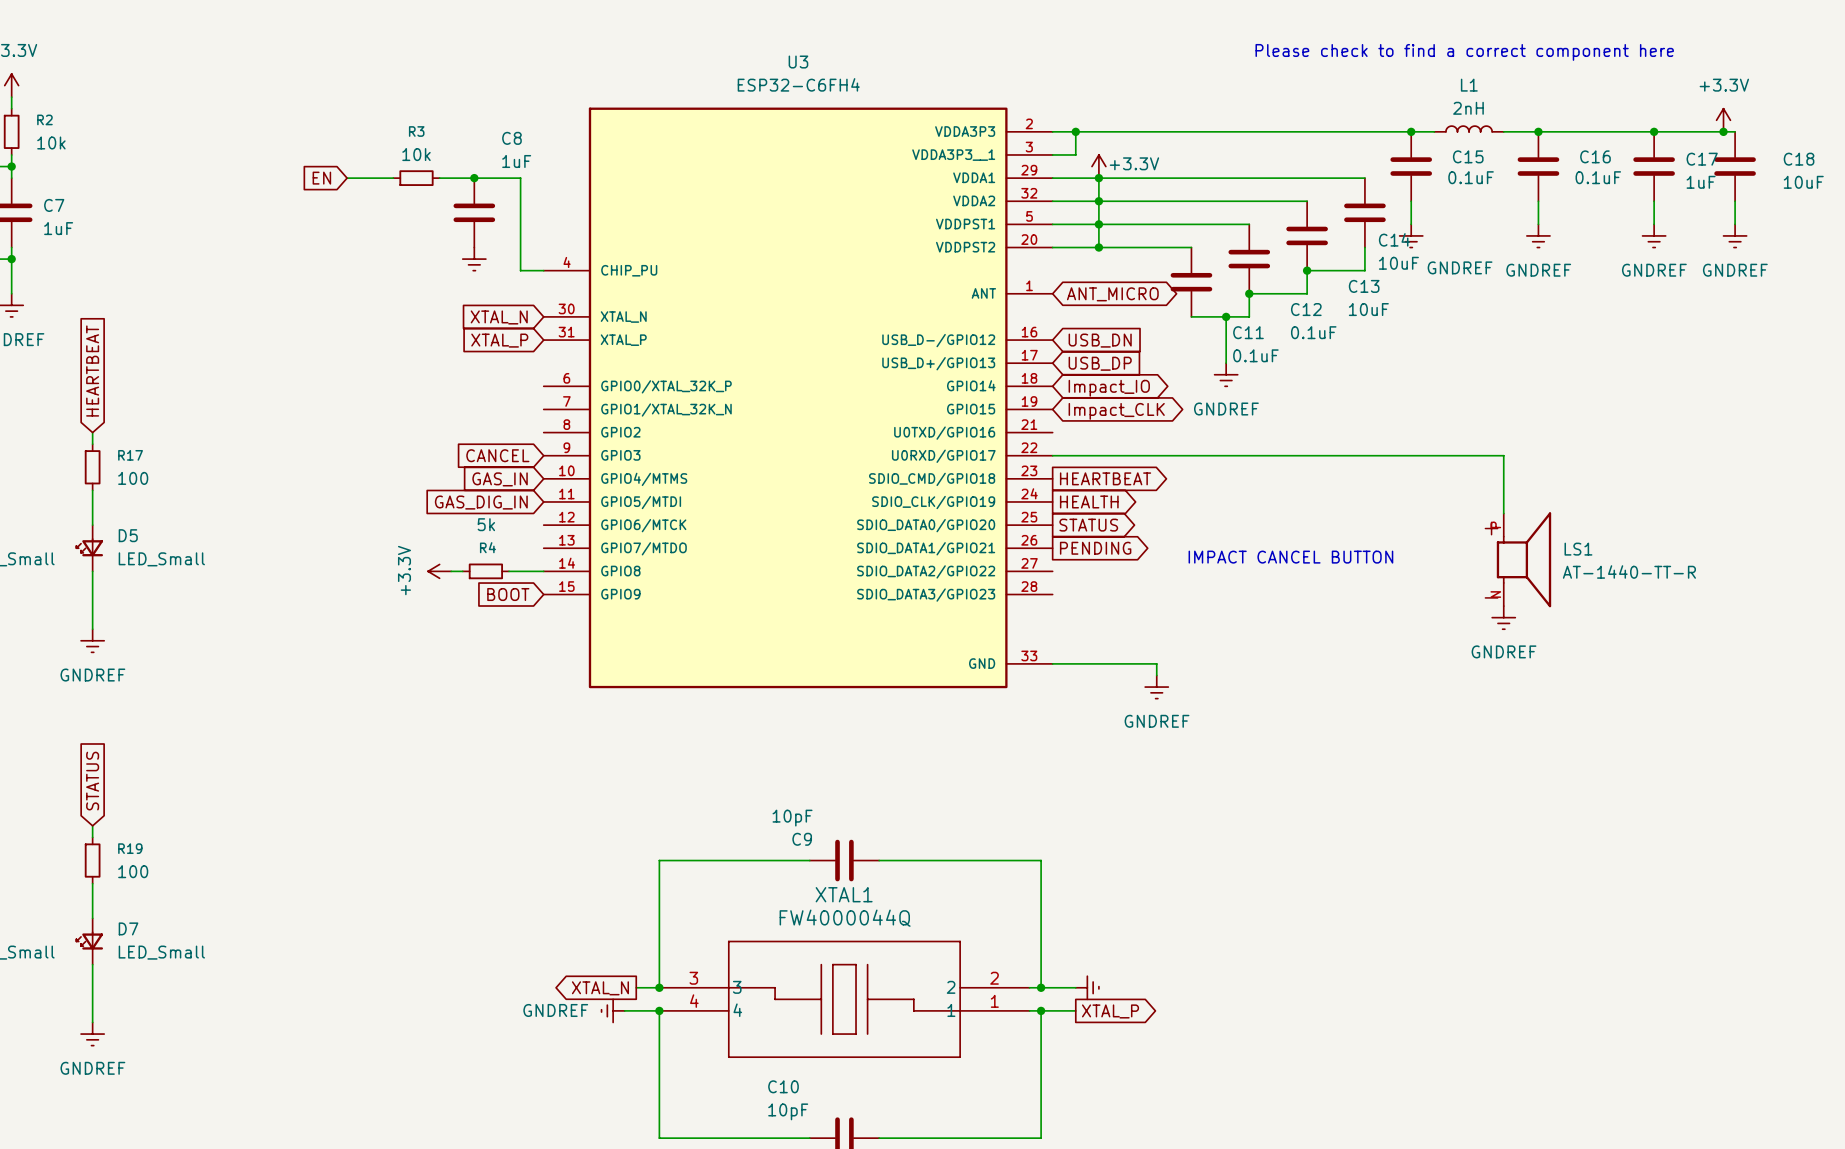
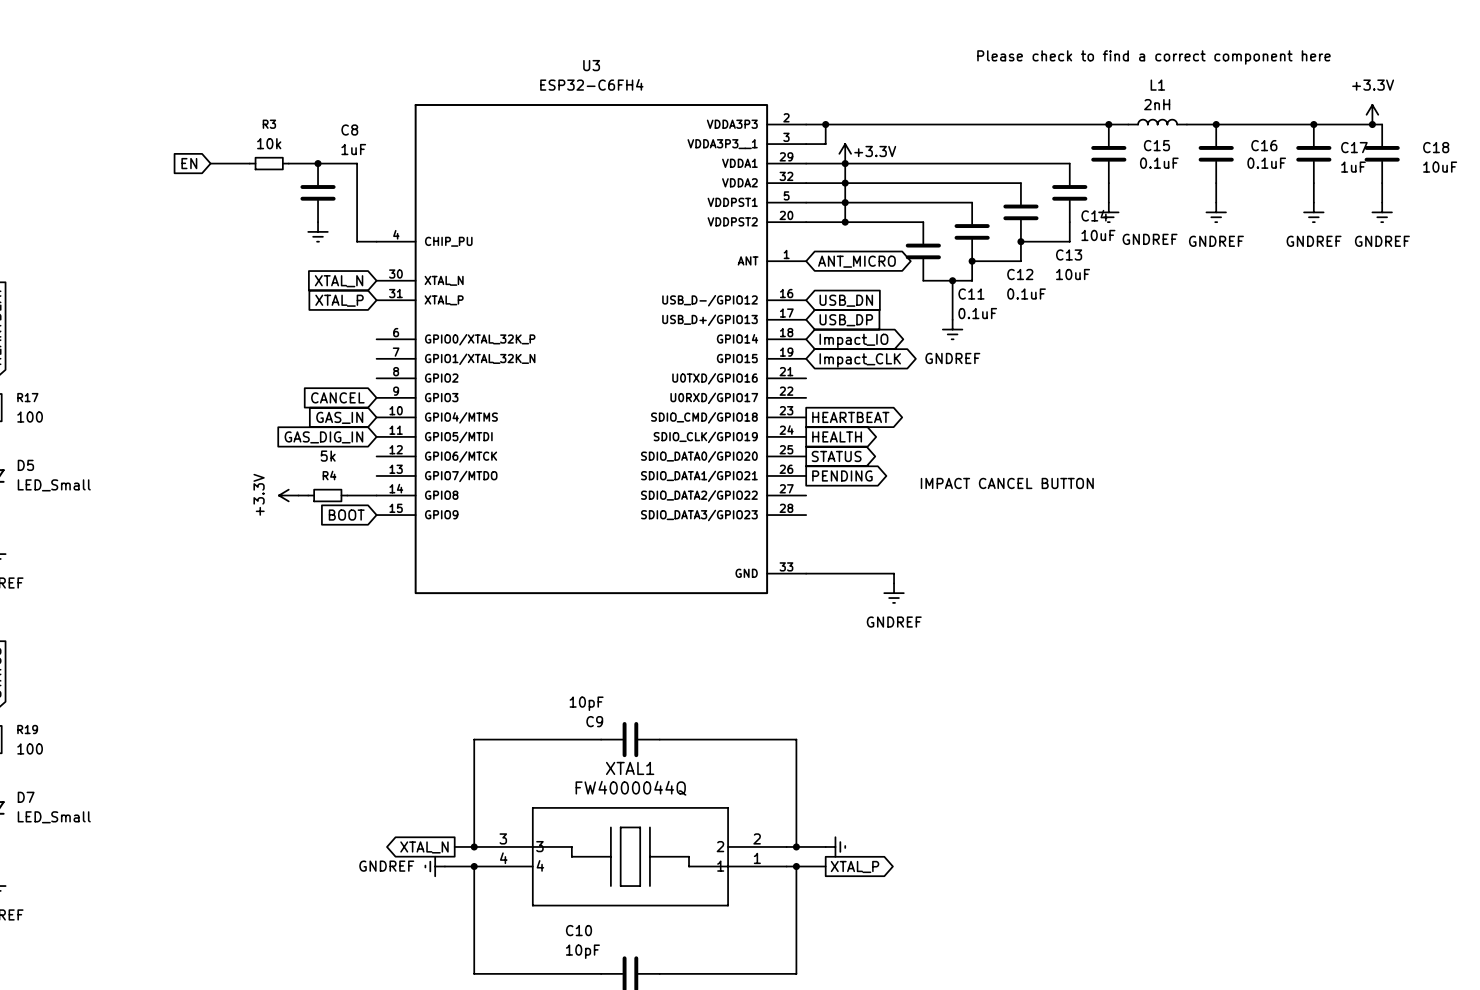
wire: (1052, 455) (1503, 455) (1503, 513) -> none
LS1: AT-1440-TT-R (1523, 559) -> none
power symbol: GNDREF (1503, 617) -> none

